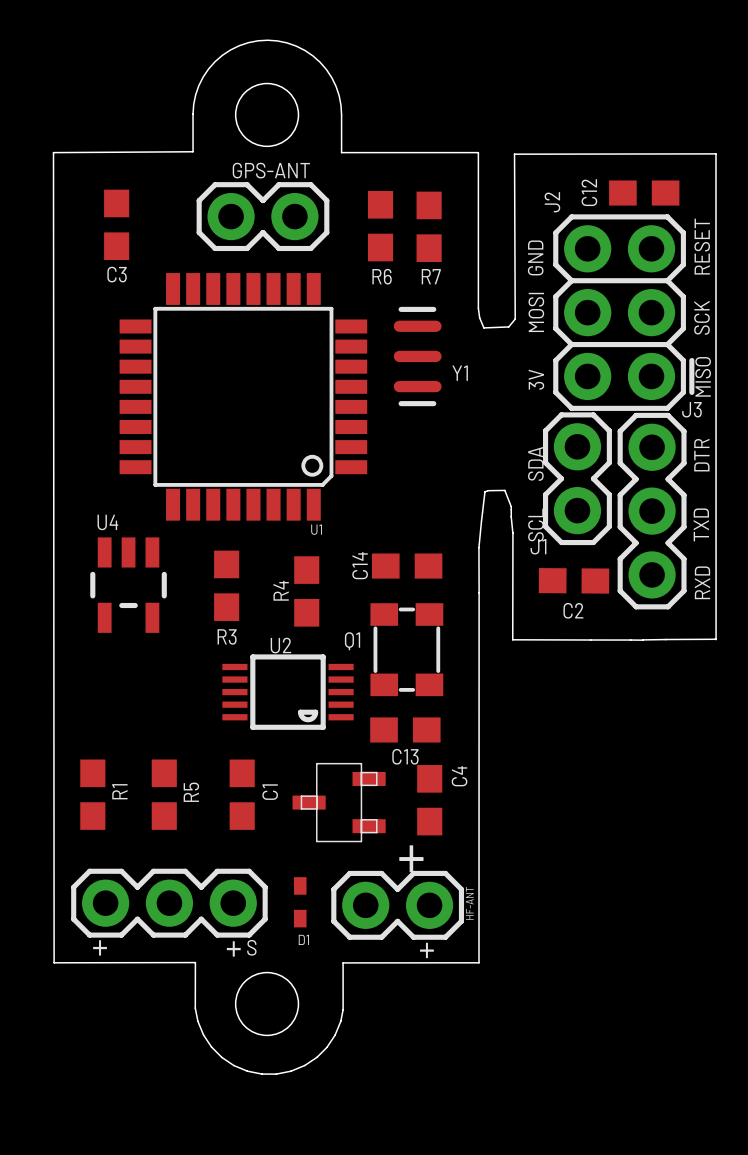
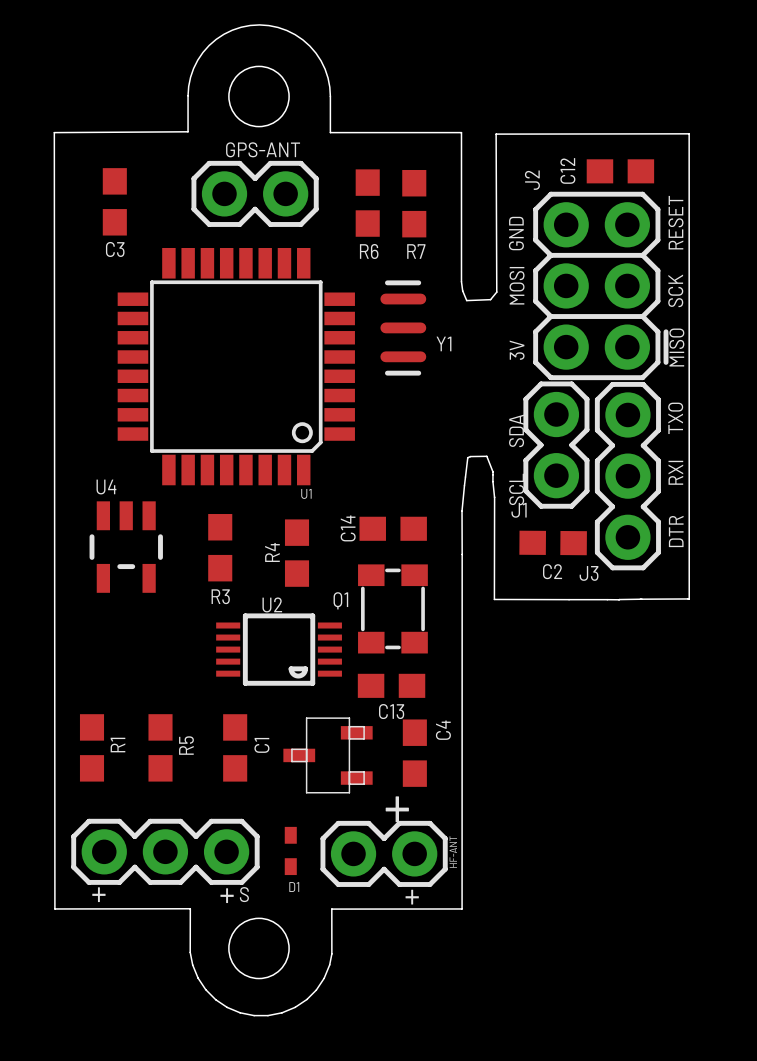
J3 name position: J3 (691, 409) -> J3 (589, 573)
text: none -> TXO (675, 418)
text position: DTR (701, 455) -> DTR (676, 531)
text: none -> RXI (675, 472)
text: TXD (701, 524) -> none
text: RXD (702, 582) -> none

